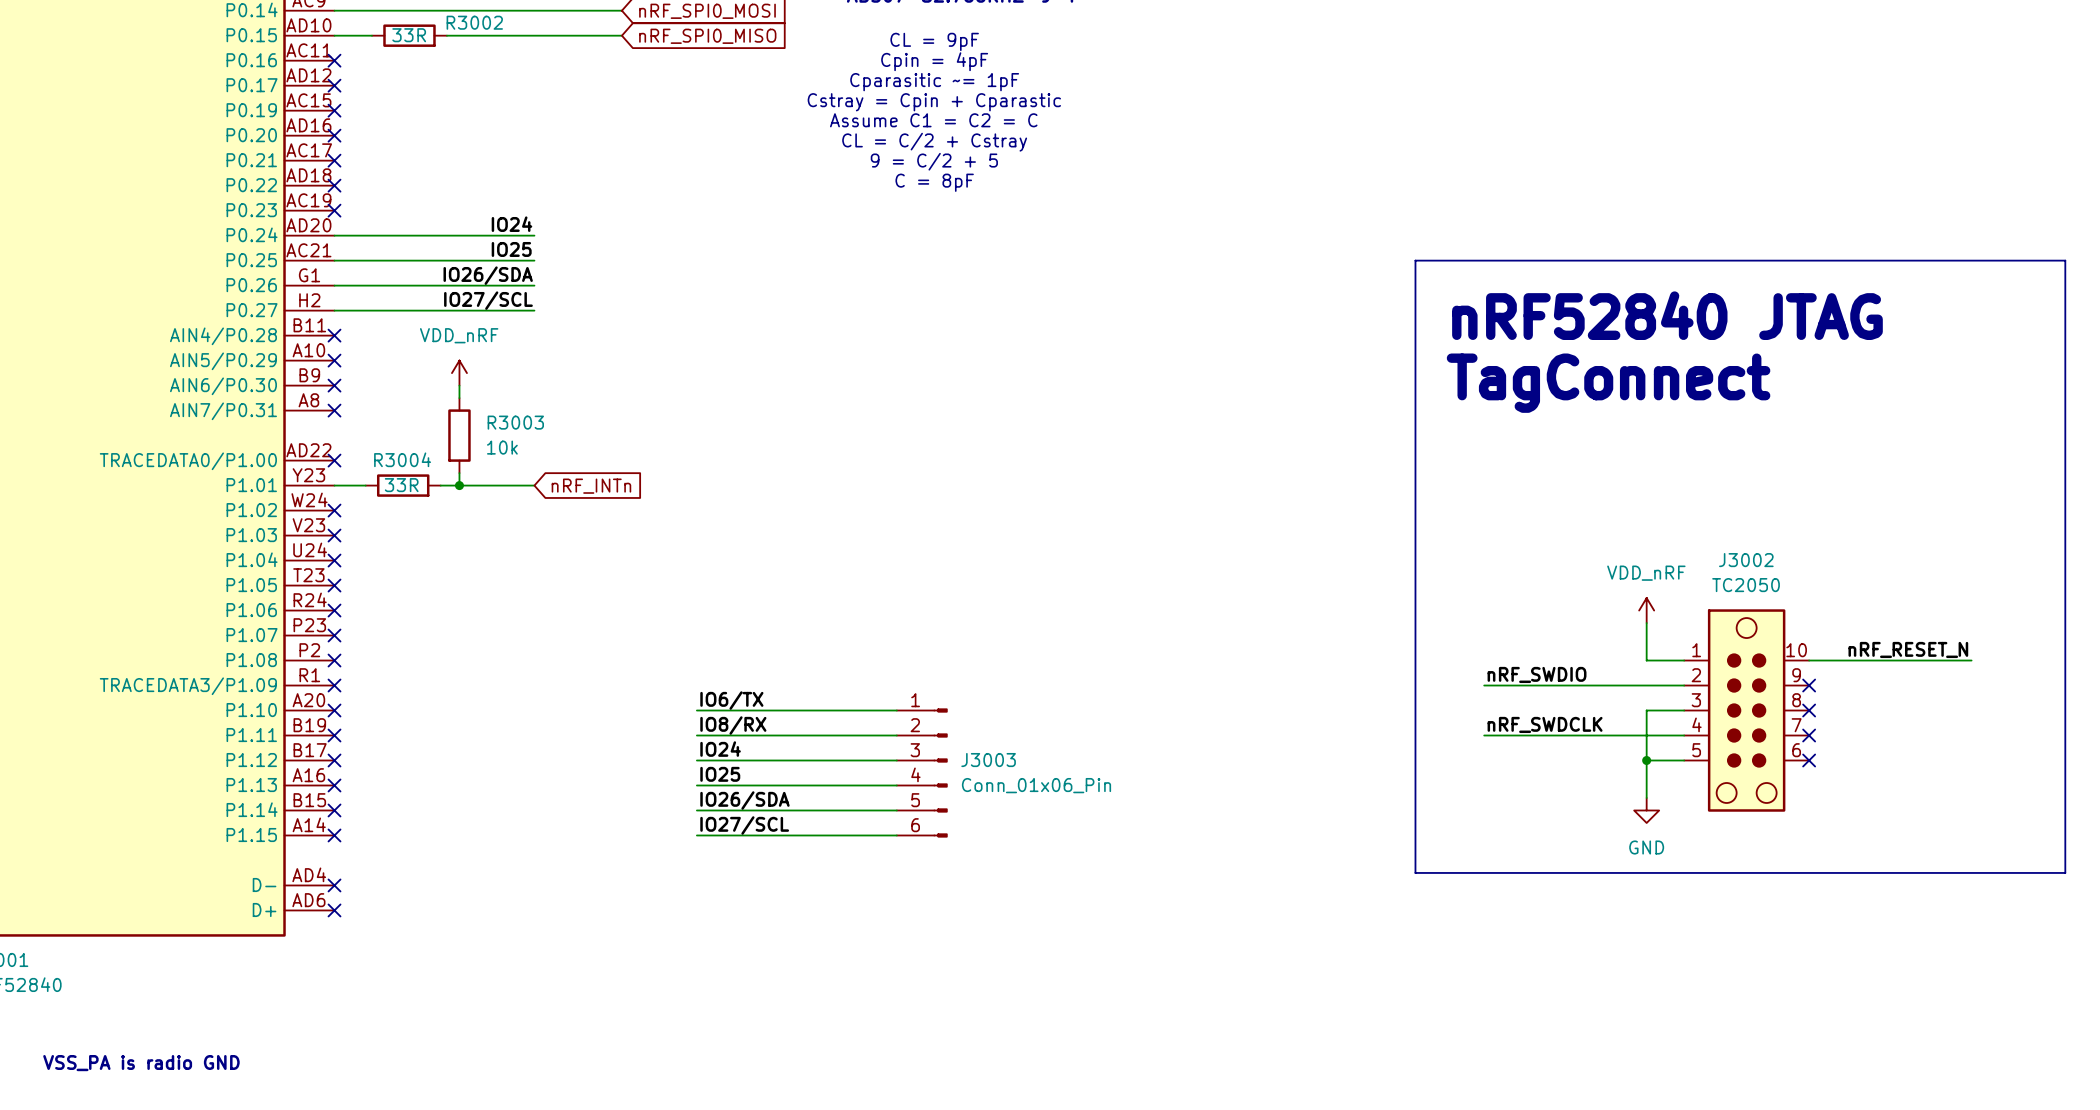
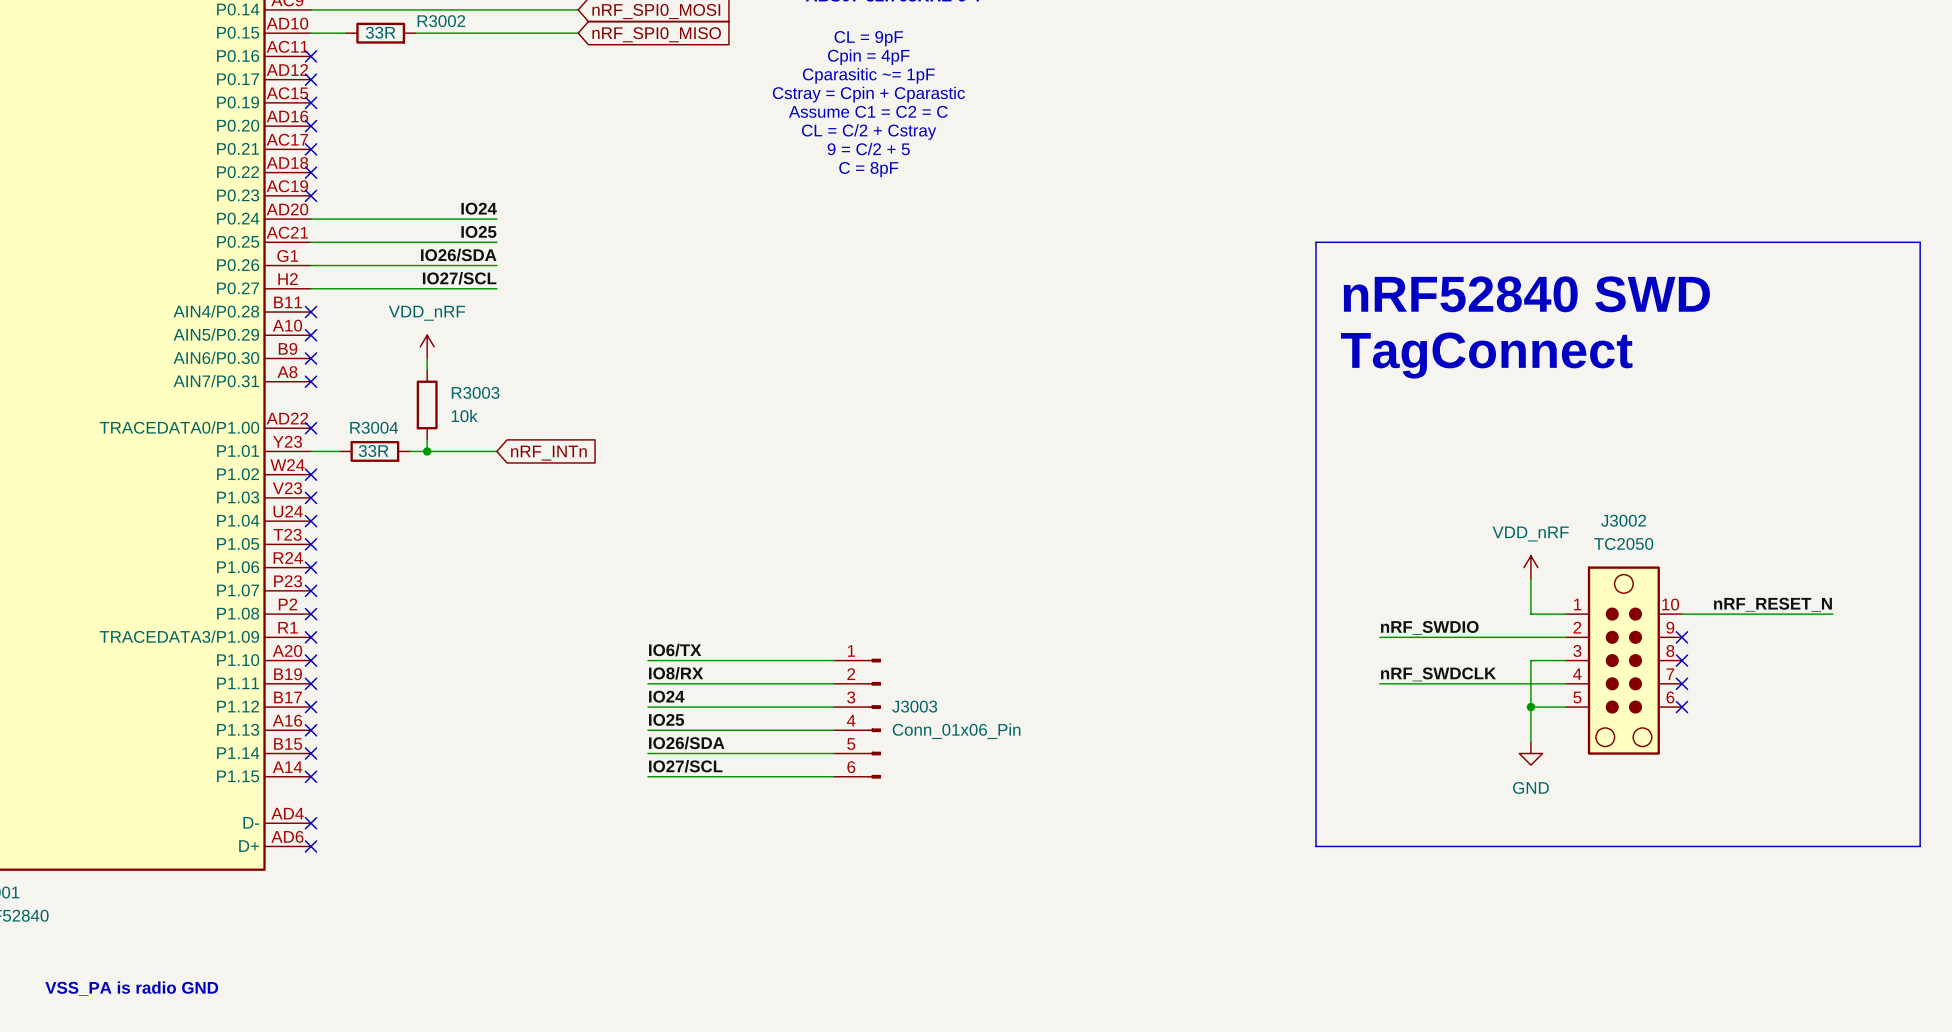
text: nRF52840 JTAG (1667, 315) -> nRF52840 SWD (1526, 294)
line: (1415, 872) (2065, 872) -> (1315, 811) (1315, 846) (1920, 846) (1920, 811)

